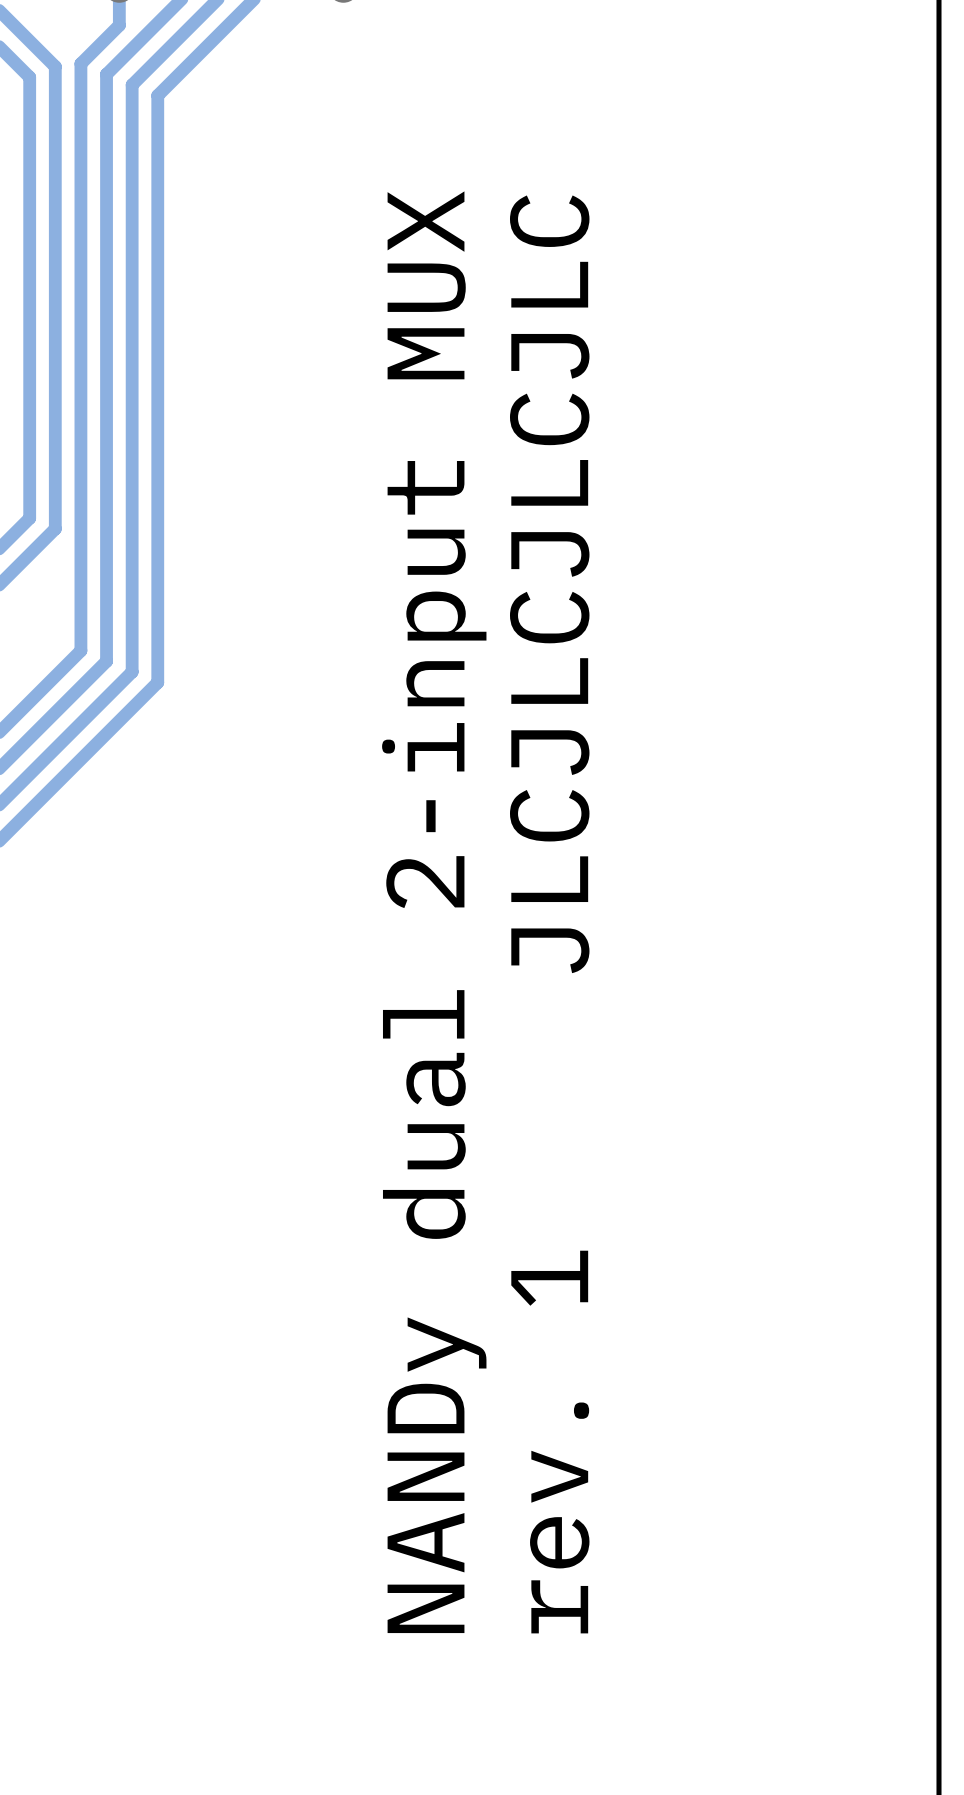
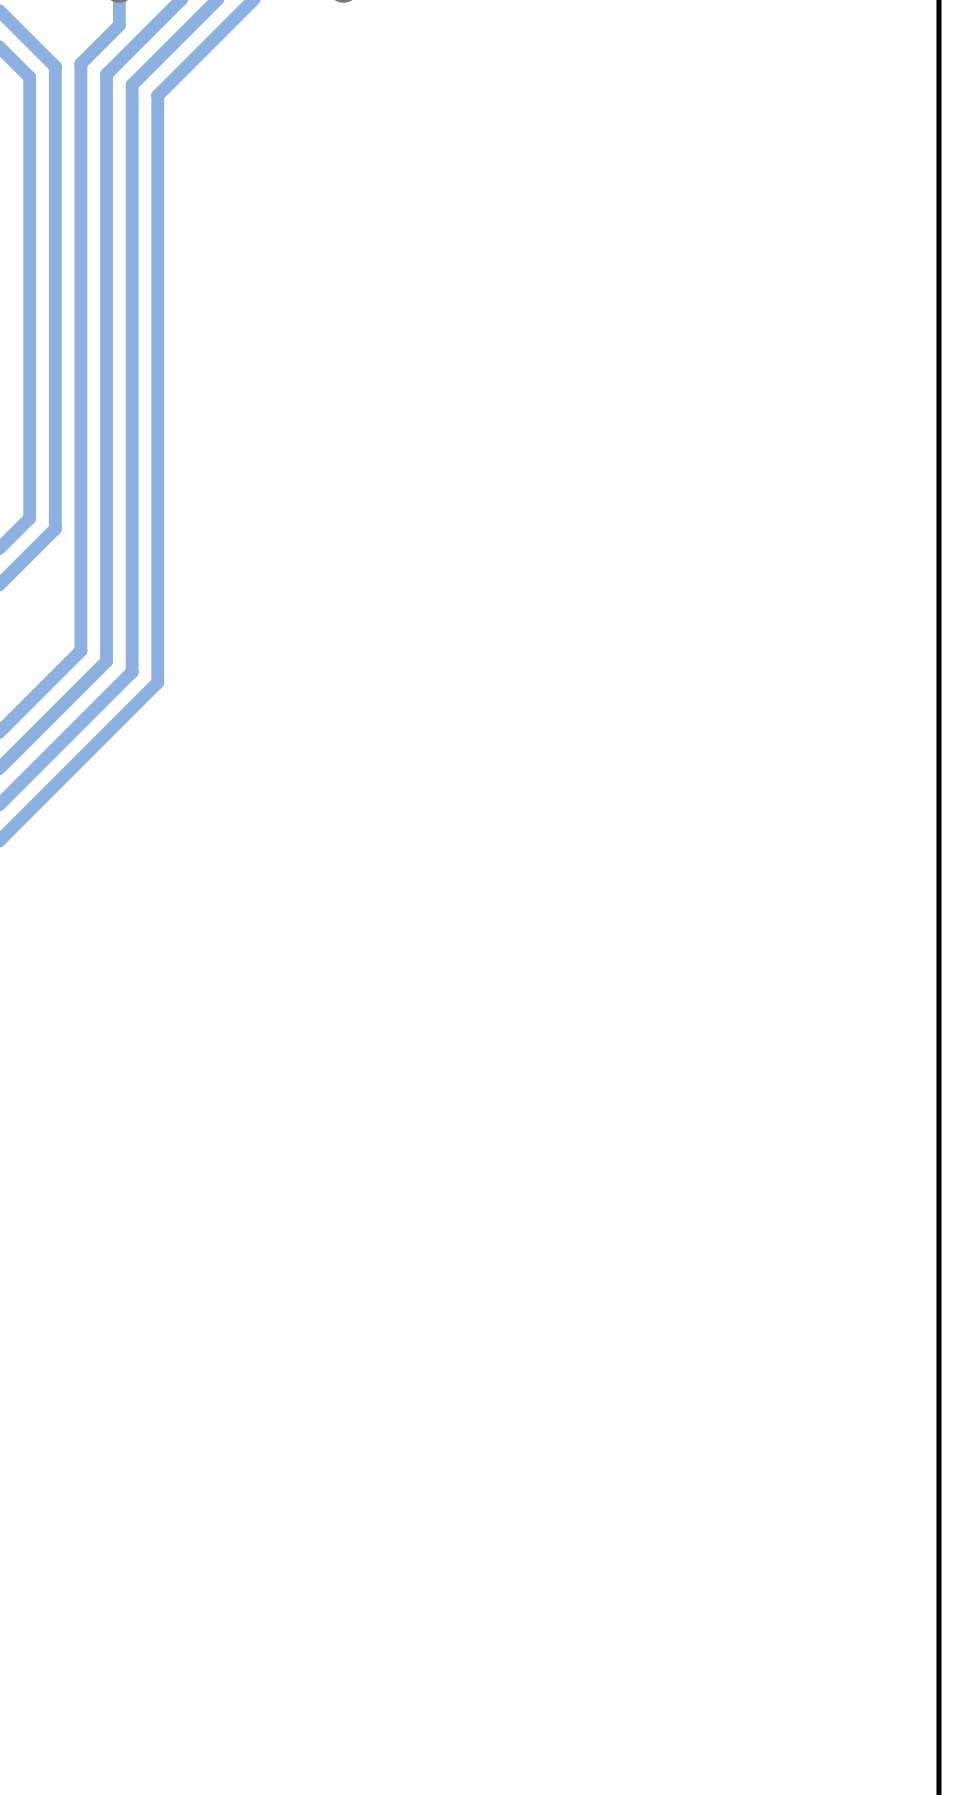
text: NANDy dual 2-input MUX (434, 912) -> none
text: rev. 1 JLCJLCJLCJLC (549, 914) -> none

